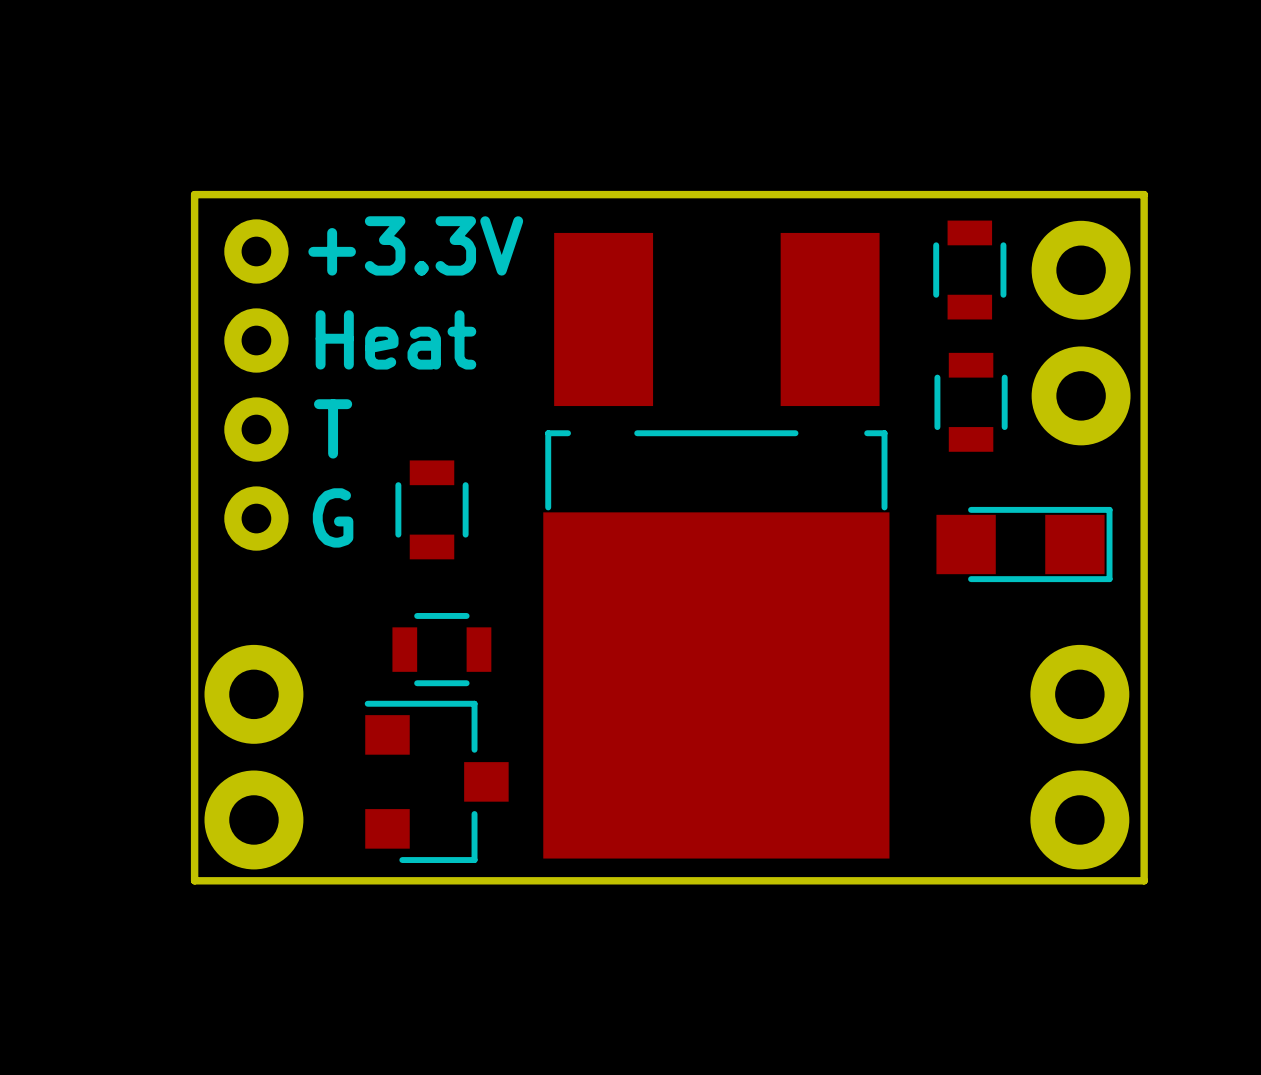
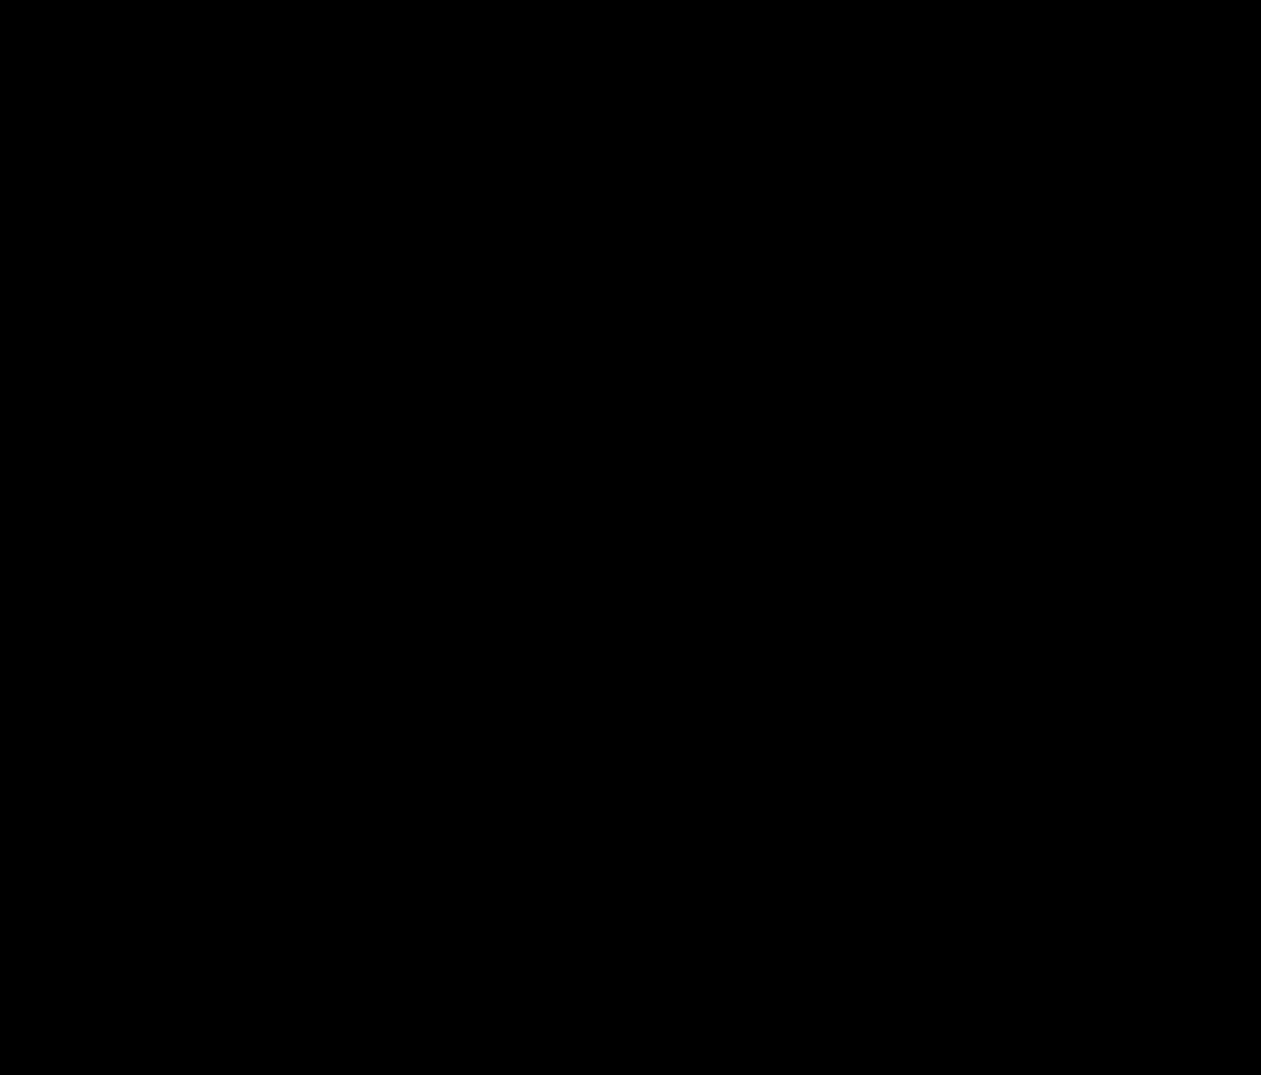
board edge: (194, 194) (194, 880) (1144, 880) (1144, 194) (194, 194) -> none
text: +3.3V (415, 245) -> none
part: (969, 270) -> none
part: (1081, 333) -> none
text: Heat (395, 339) -> none
part: (256, 385) -> none
part: (971, 402) -> none
text: T (333, 428) -> none
part: (432, 509) -> none
text: G (333, 517) -> none
part: (1024, 544) -> none
part: (716, 545) -> none
part: (441, 649) -> none
part: (253, 757) -> none
part: (1079, 757) -> none
part: (436, 781) -> none

